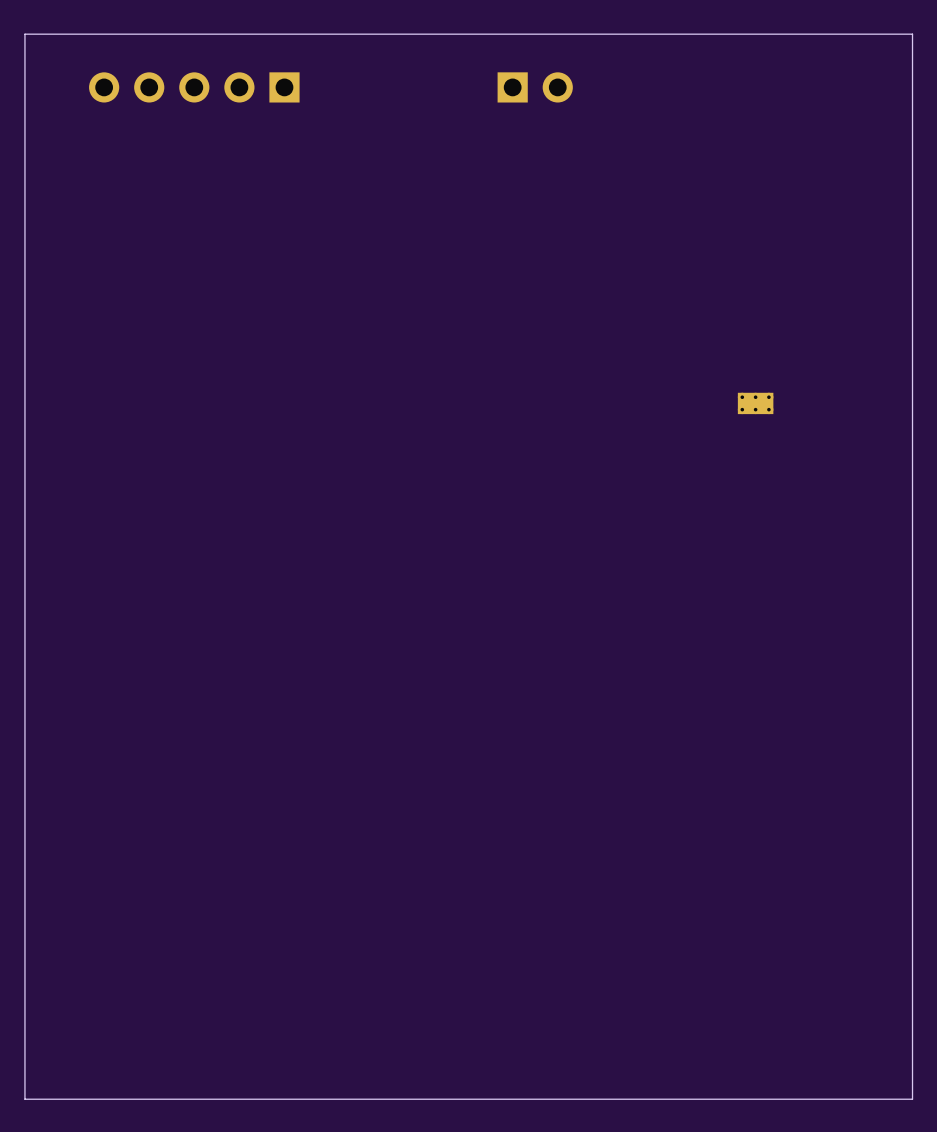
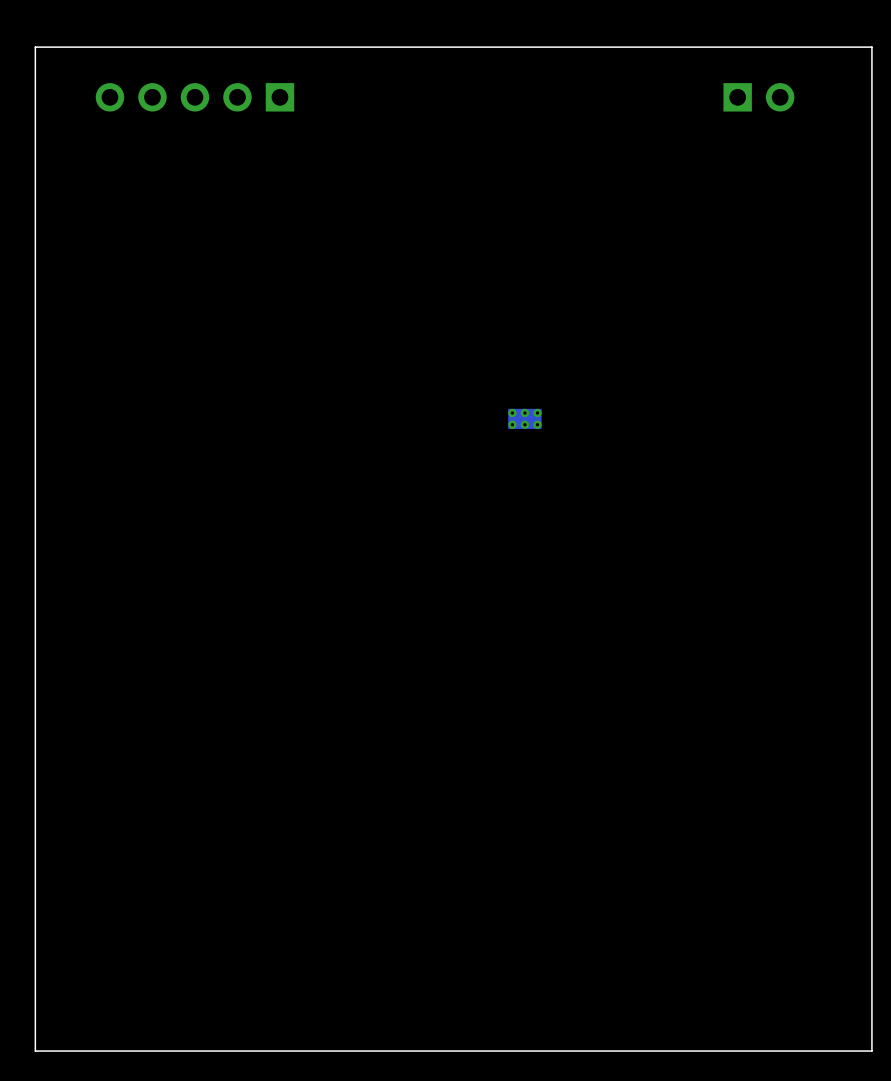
part position: (535, 87) -> (758, 97)
part position: (755, 403) -> (524, 418)

